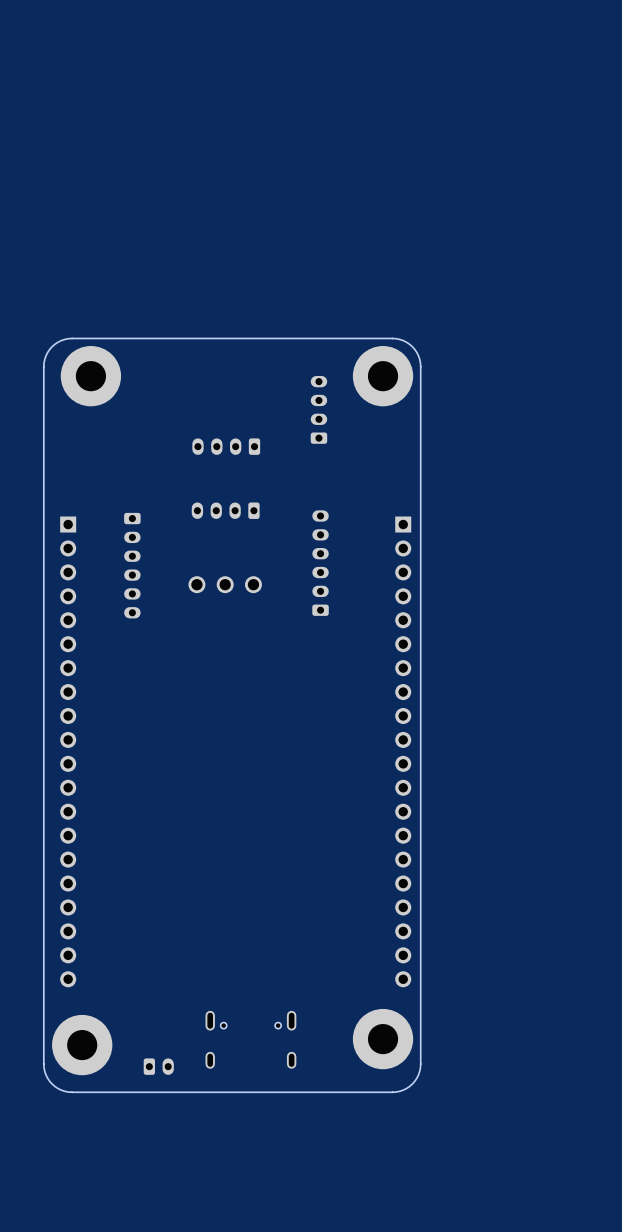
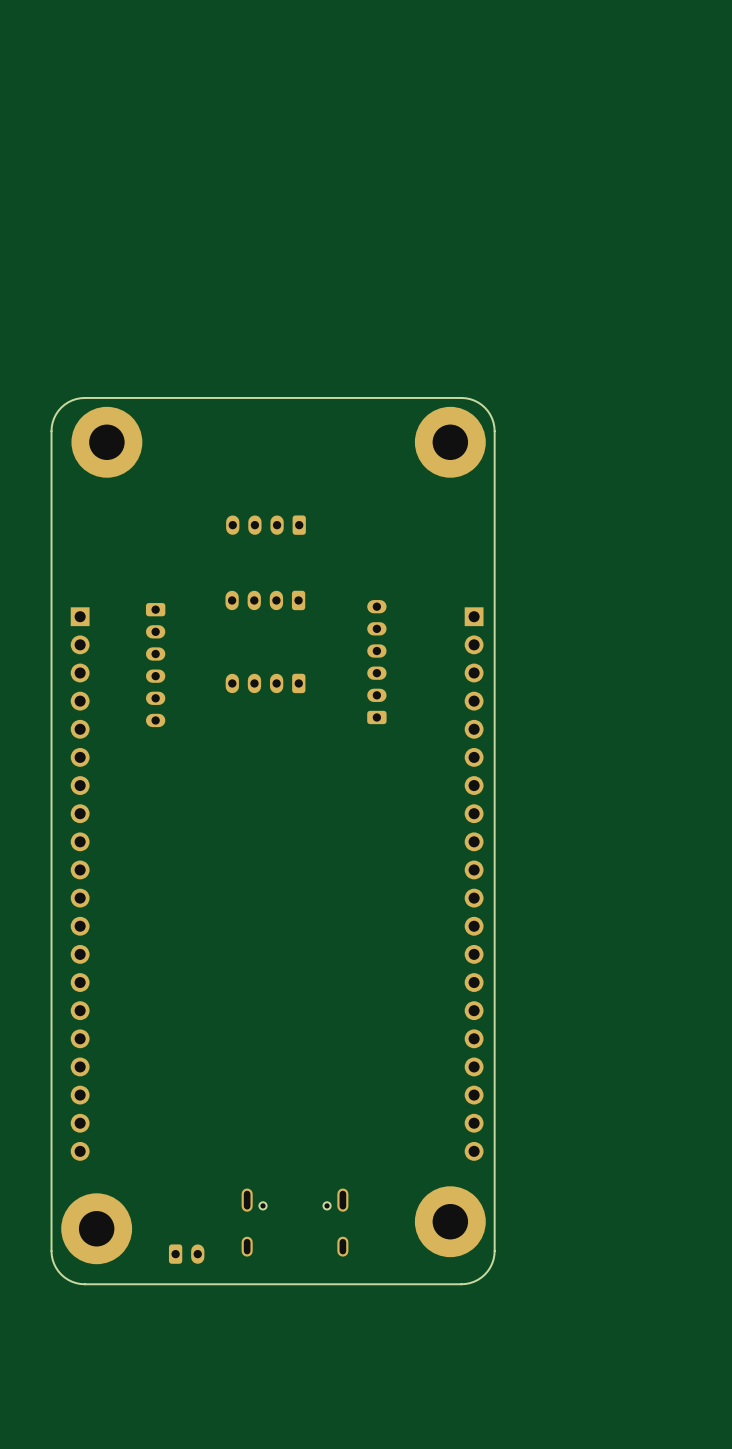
part: (318, 409) -> none
part footprint: [188, 576, 262, 594] -> [225, 673, 306, 694]

